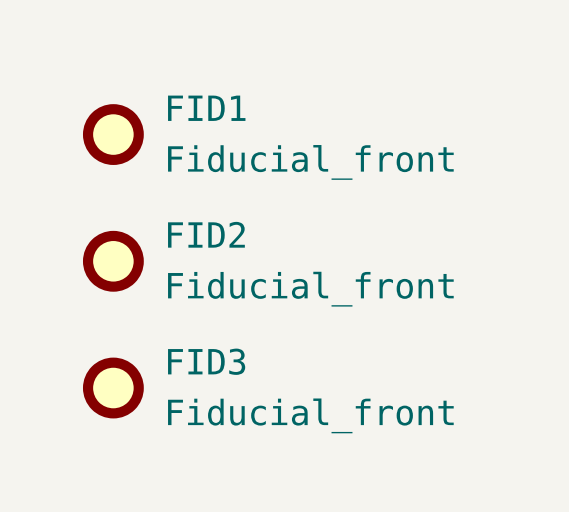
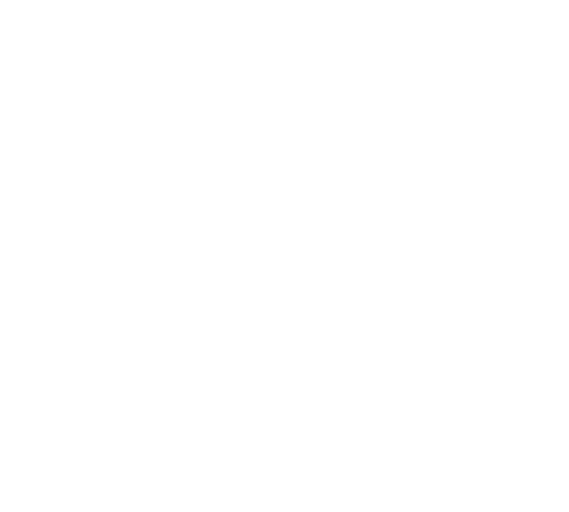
FID1: Fiducial_front (113, 134) -> none
FID2: Fiducial_front (113, 261) -> none
FID3: Fiducial_front (113, 388) -> none

